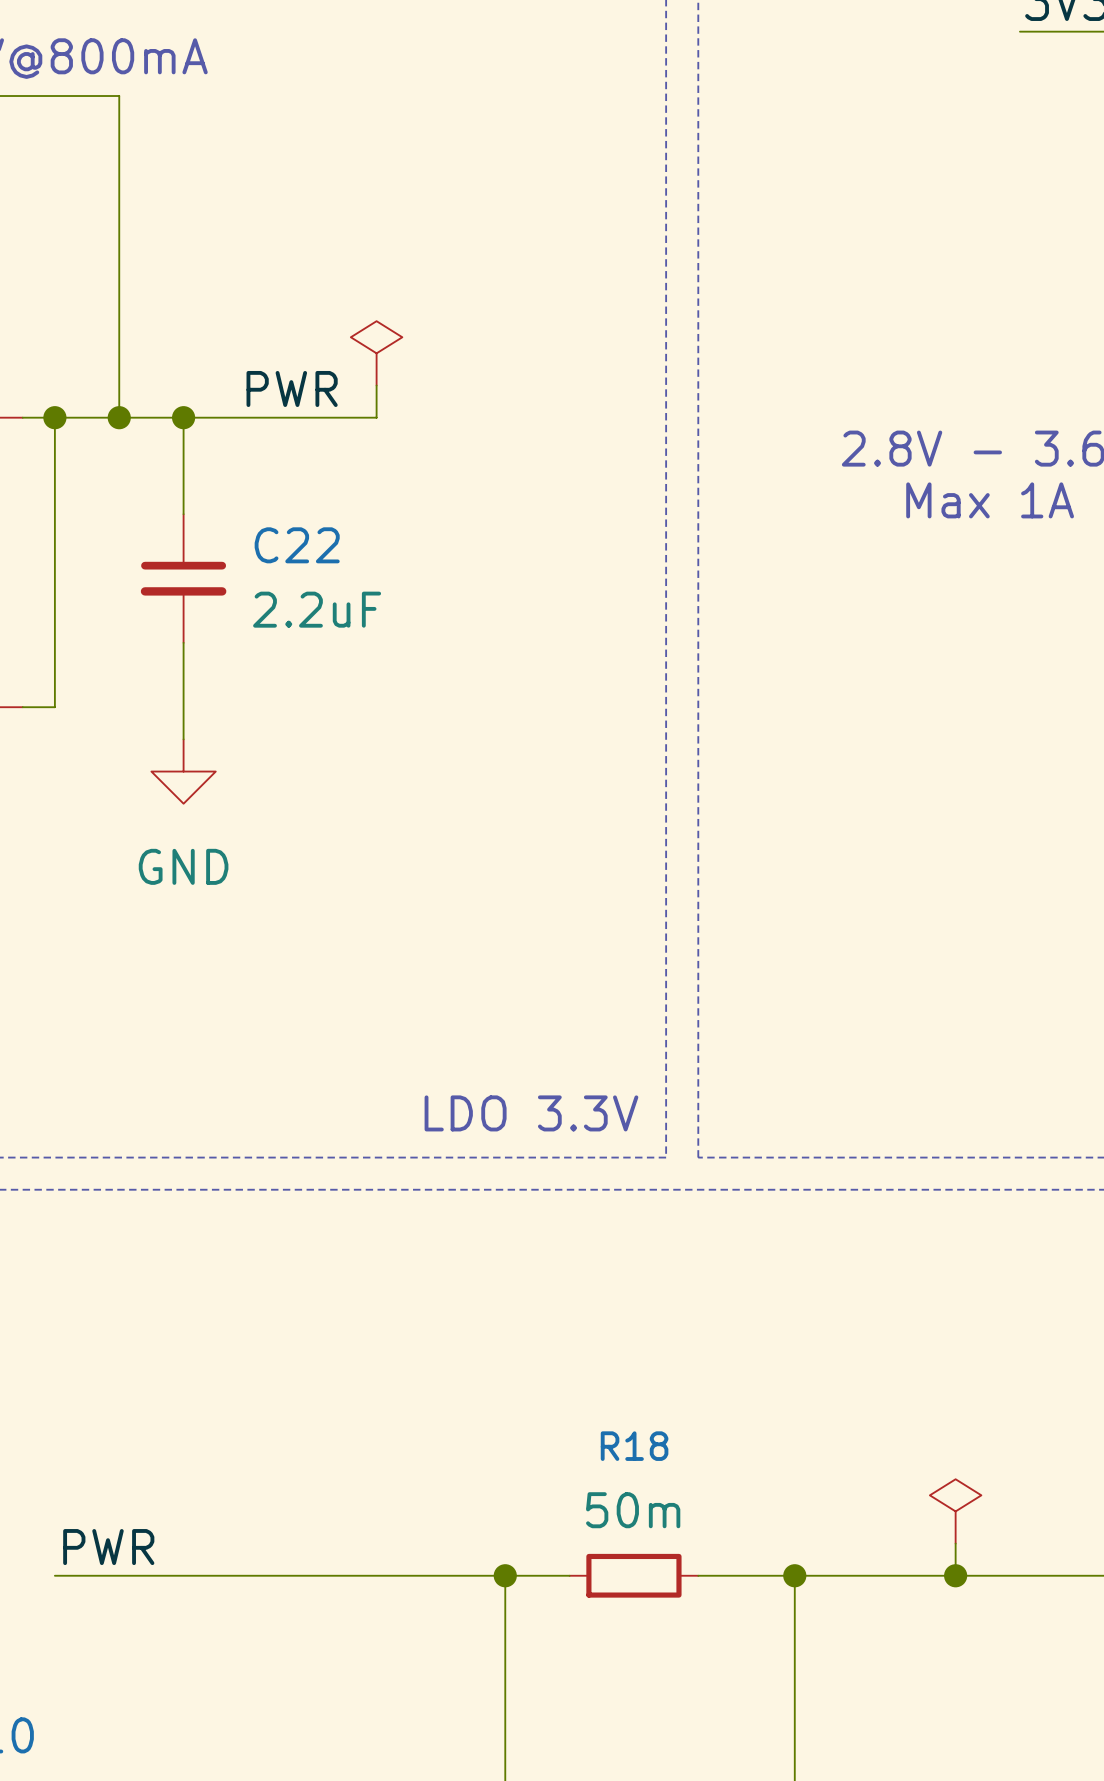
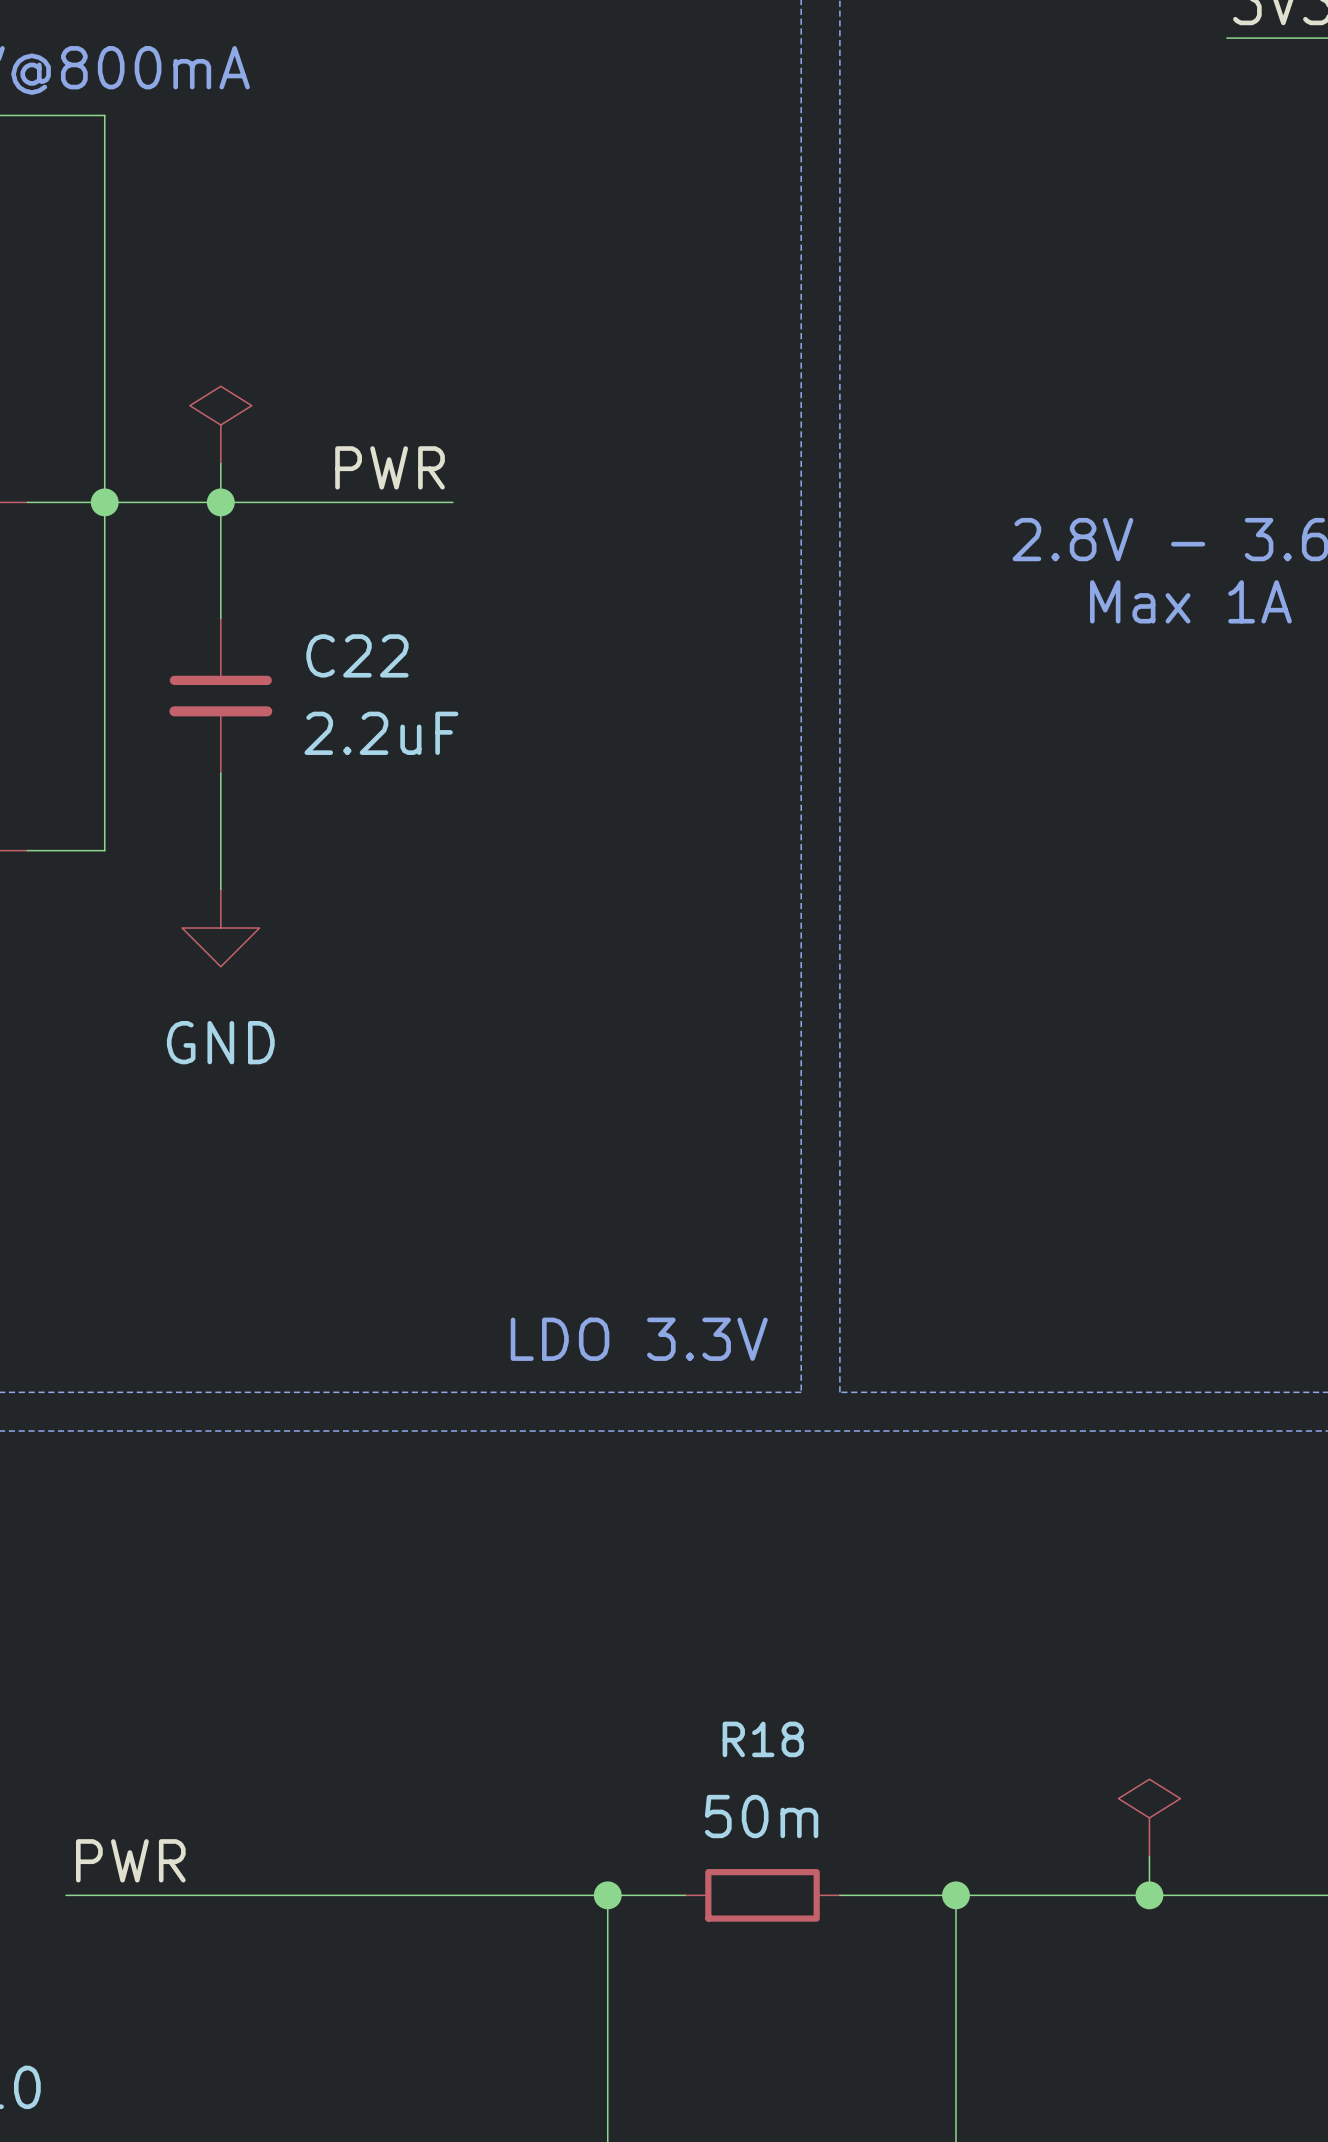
wire: (87, 96) (119, 96) (119, 417) -> (104, 115) (104, 850) (66, 850)
power symbol position: (376, 353) -> (220, 425)
wire: (376, 385) (376, 417) -> (220, 463) (220, 502)
label position: PWR (292, 388) -> PWR (390, 467)
wire: (54, 417) (54, 707) -> none
junction: (54, 417) -> none
junction: none -> (104, 502)
junction: (119, 417) -> none

